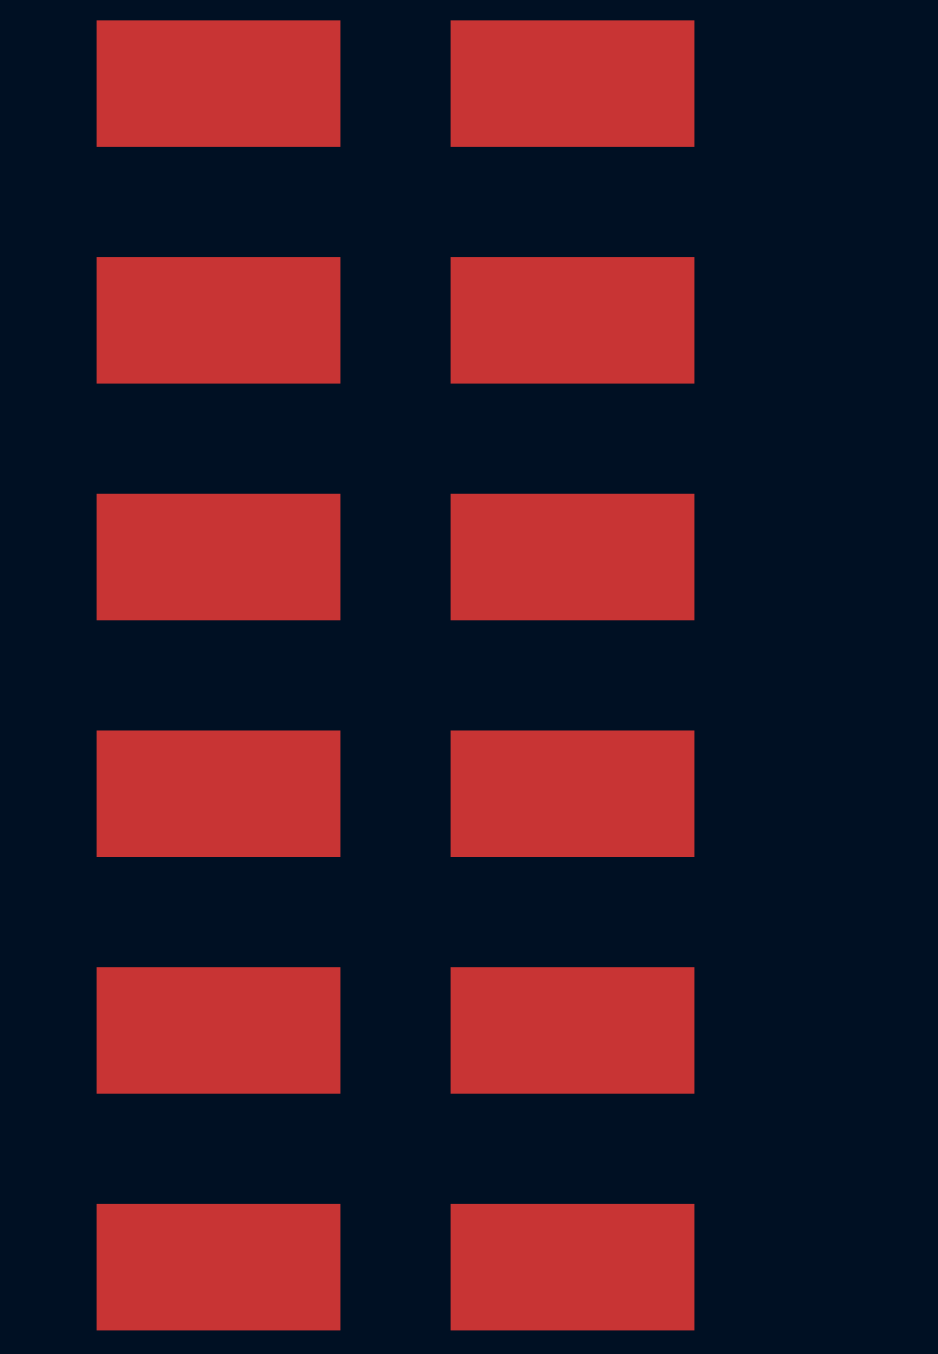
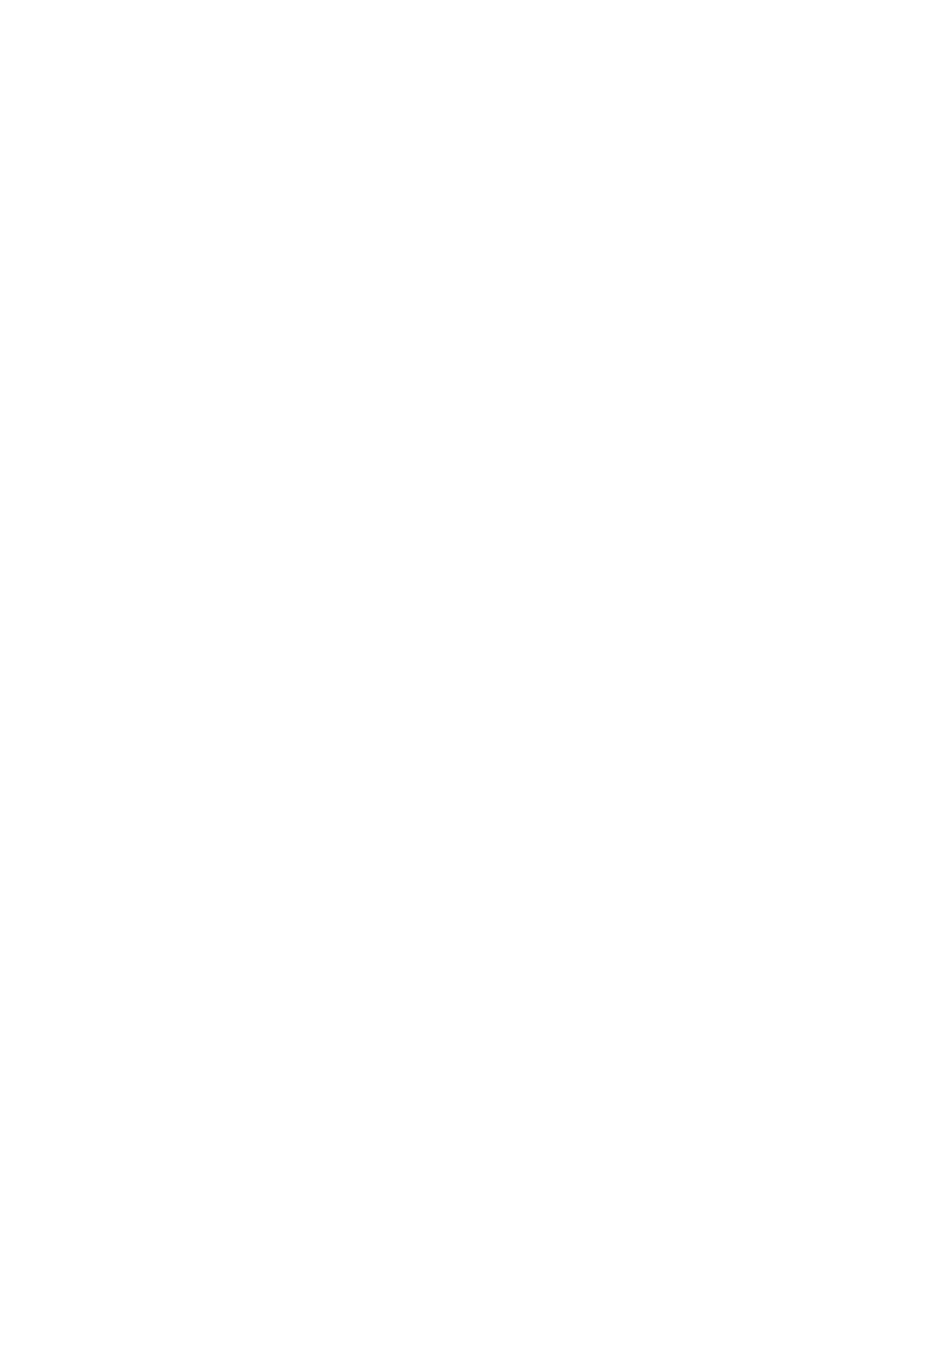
part: (218, 83) -> none
part: (572, 83) -> none
part: (218, 320) -> none
part: (572, 320) -> none
part: (218, 557) -> none
part: (572, 557) -> none
part: (218, 793) -> none
part: (572, 793) -> none
part: (218, 1030) -> none
part: (572, 1030) -> none
part: (218, 1267) -> none
part: (572, 1267) -> none

